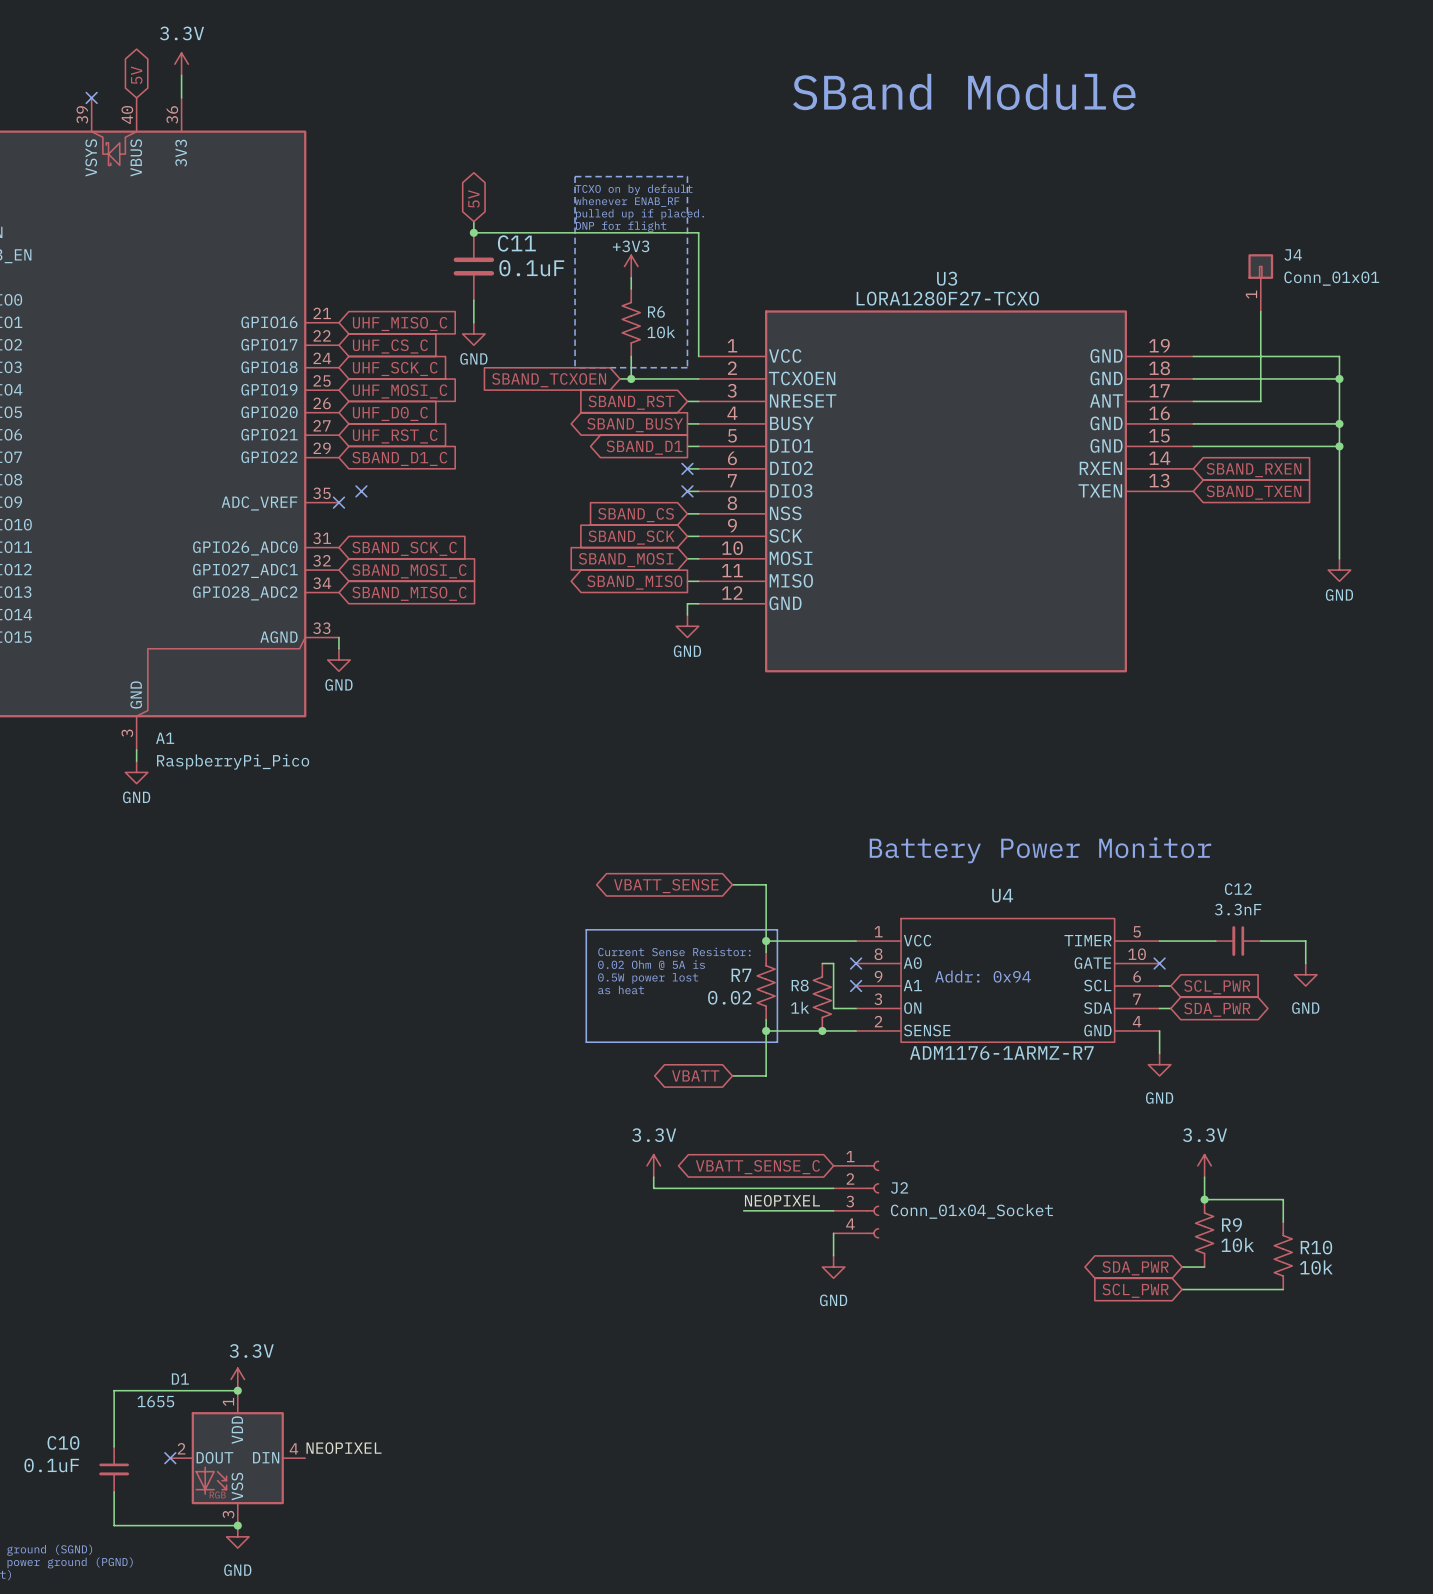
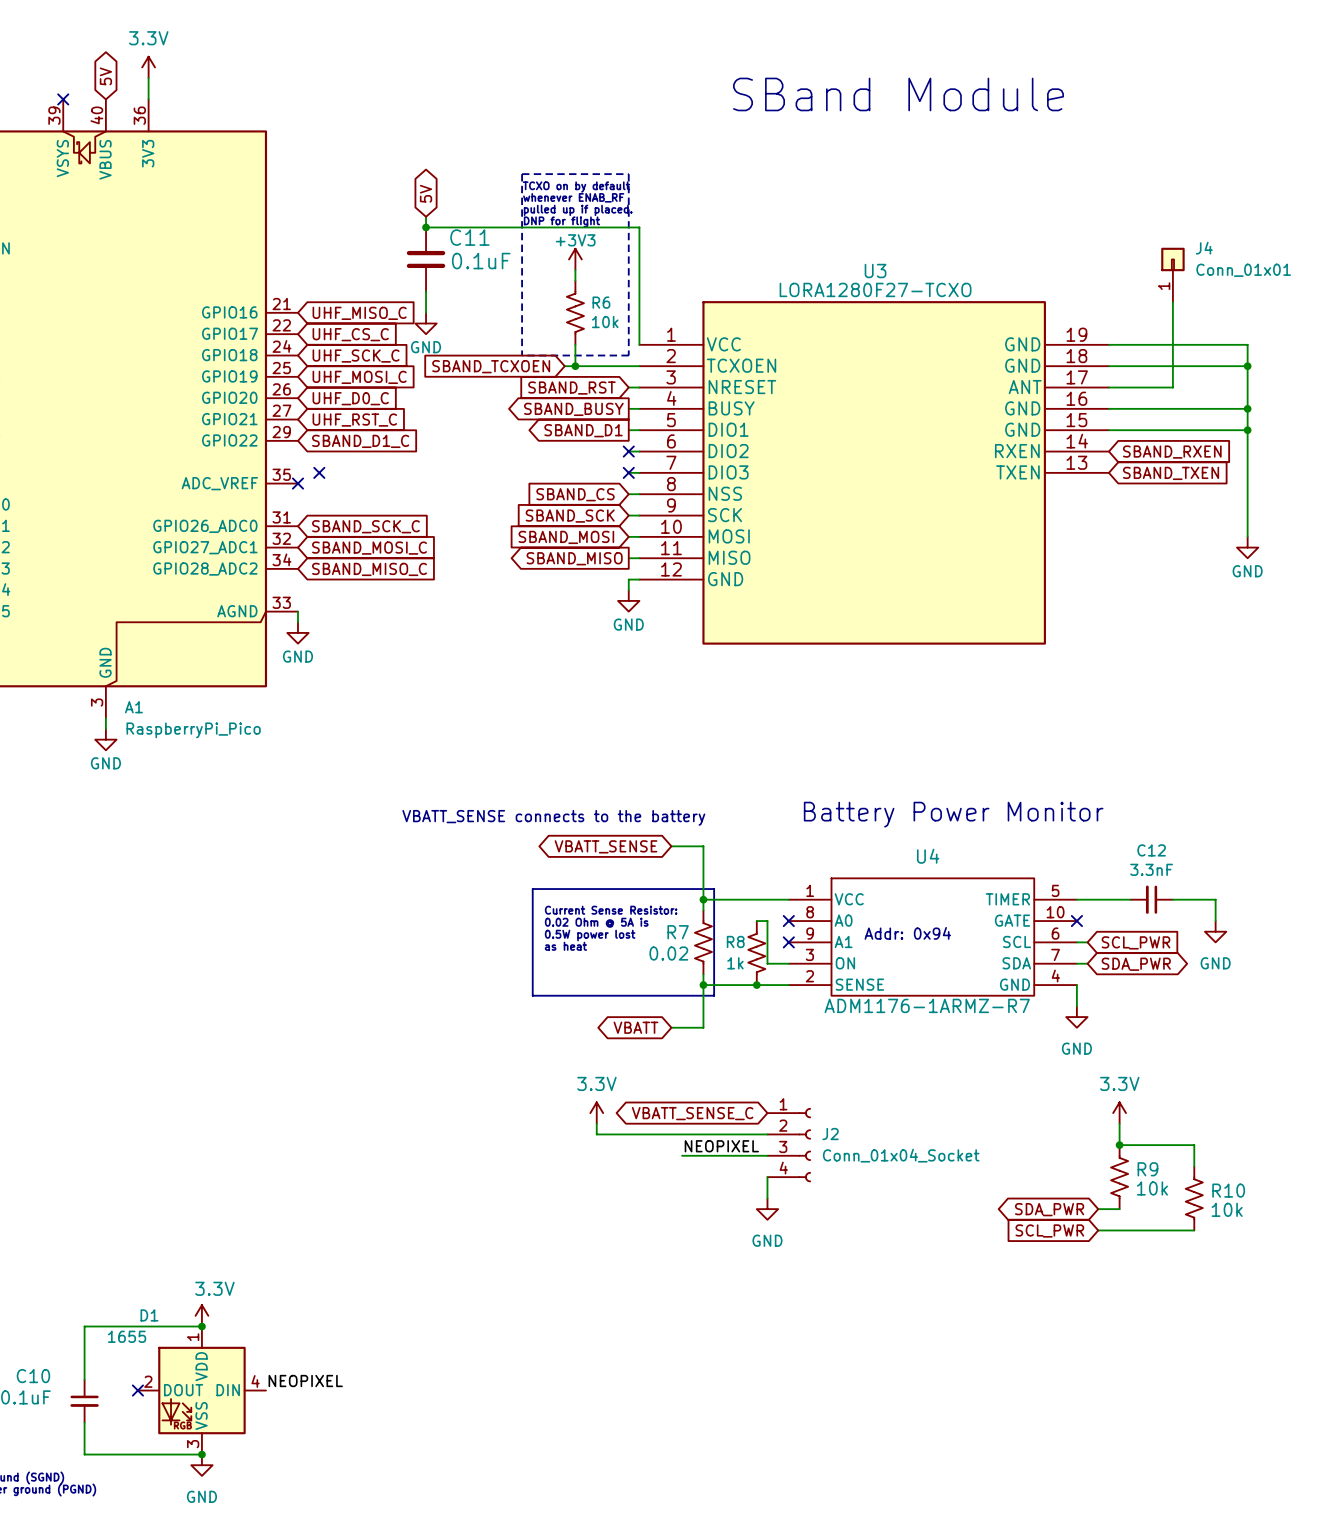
text: none -> VBATT_SENSE connects to the battery (553, 817)

